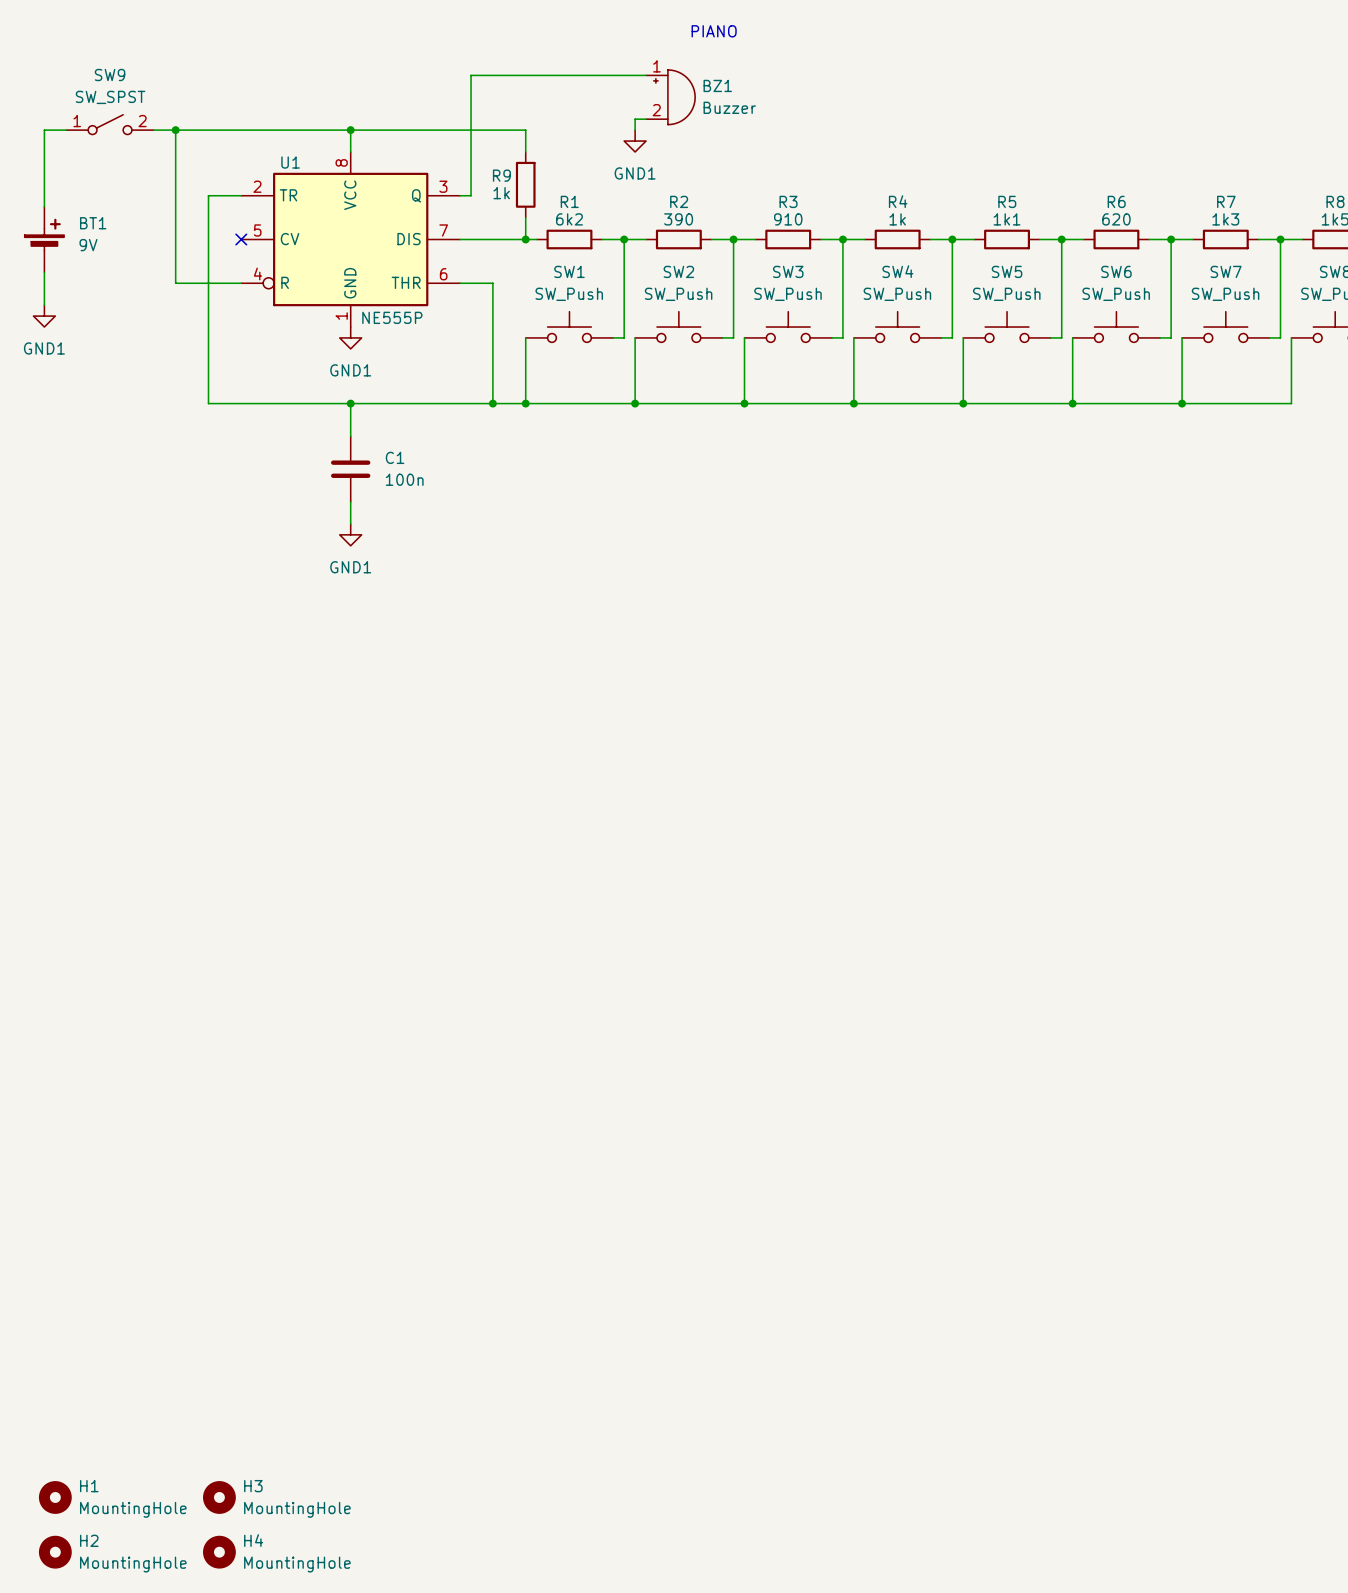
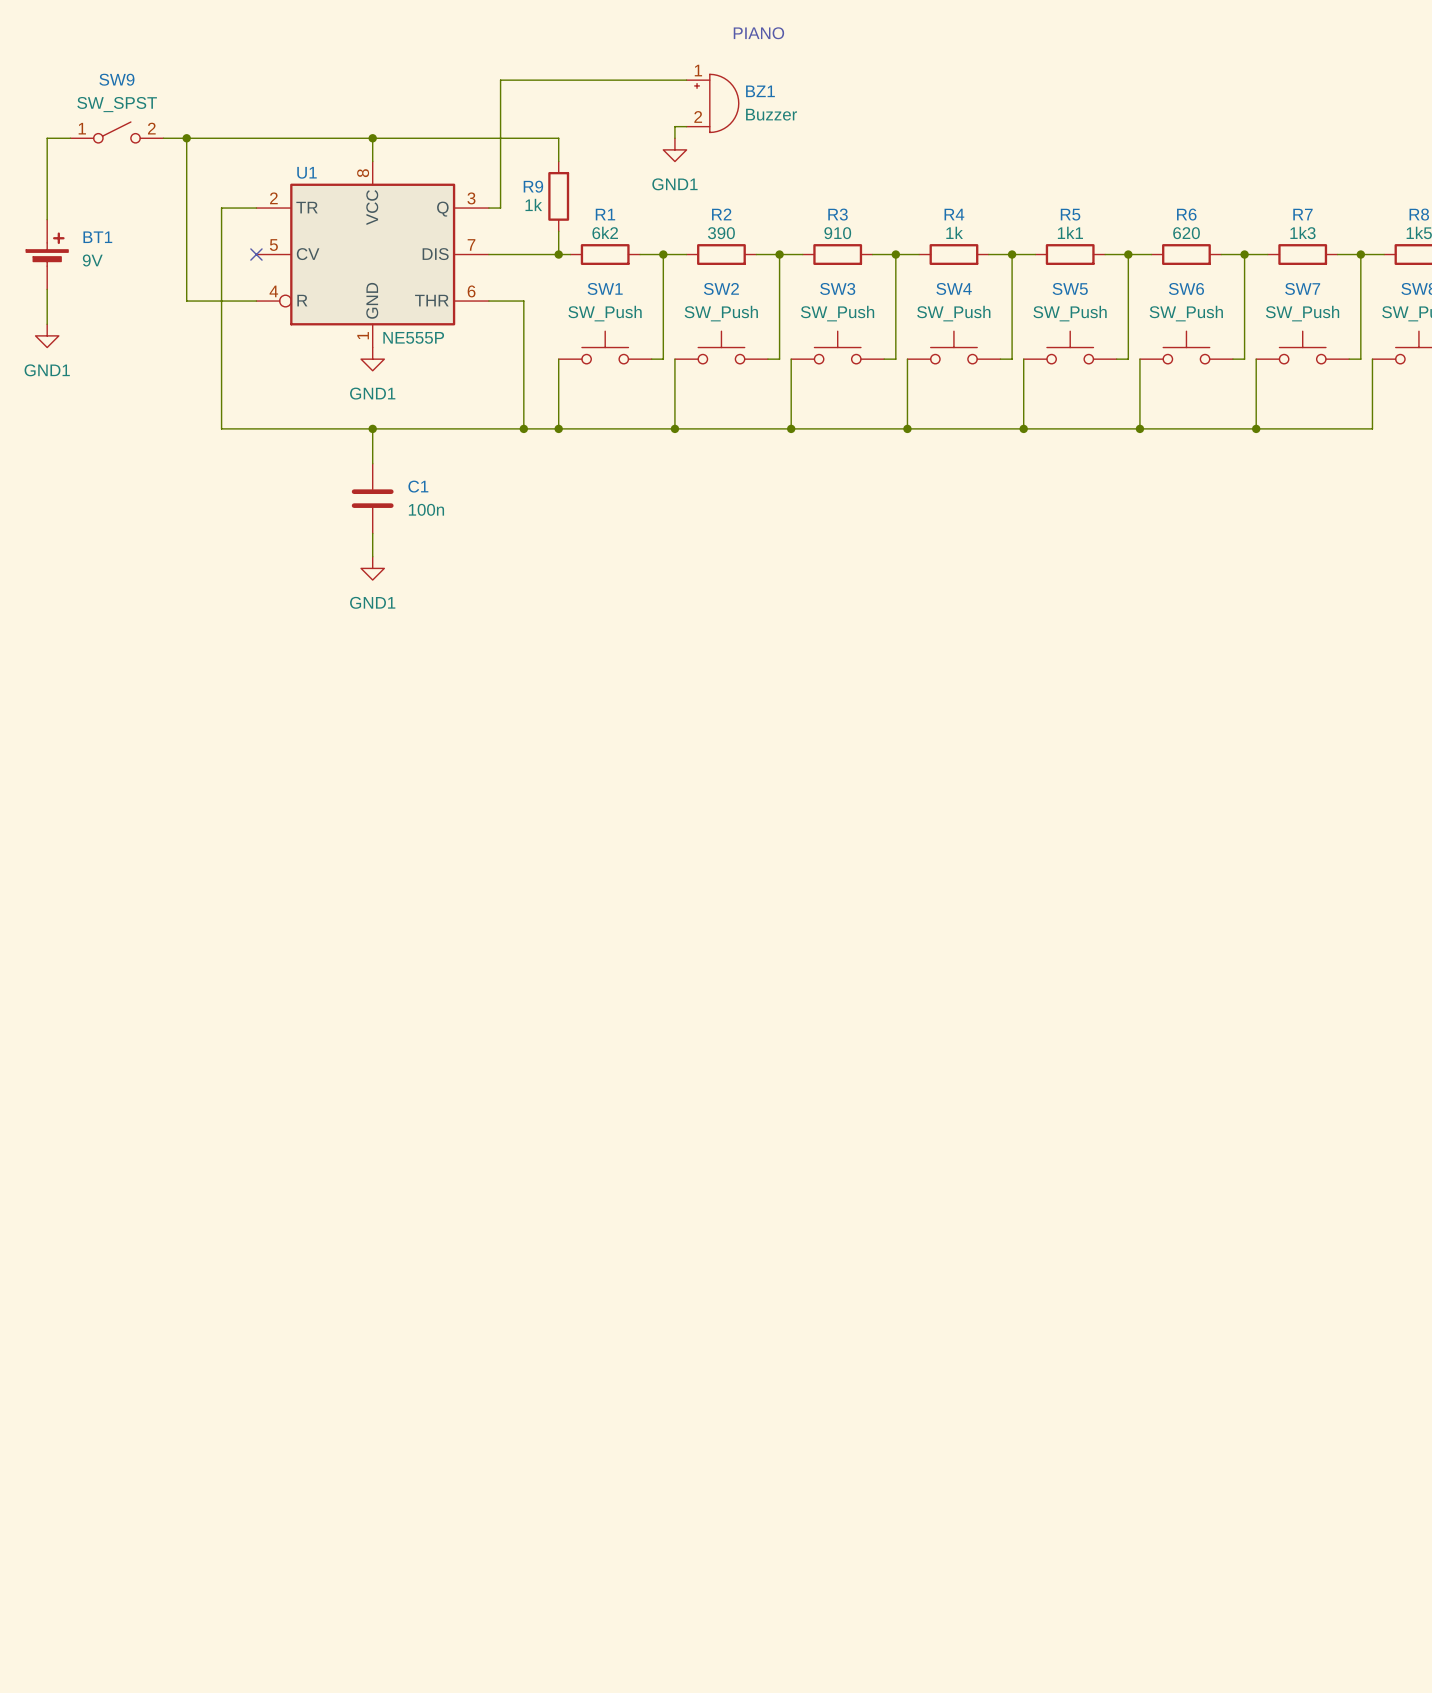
H1: MountingHole (55, 1497) -> none
H3: MountingHole (219, 1497) -> none
H2: MountingHole (55, 1552) -> none
H4: MountingHole (219, 1552) -> none

